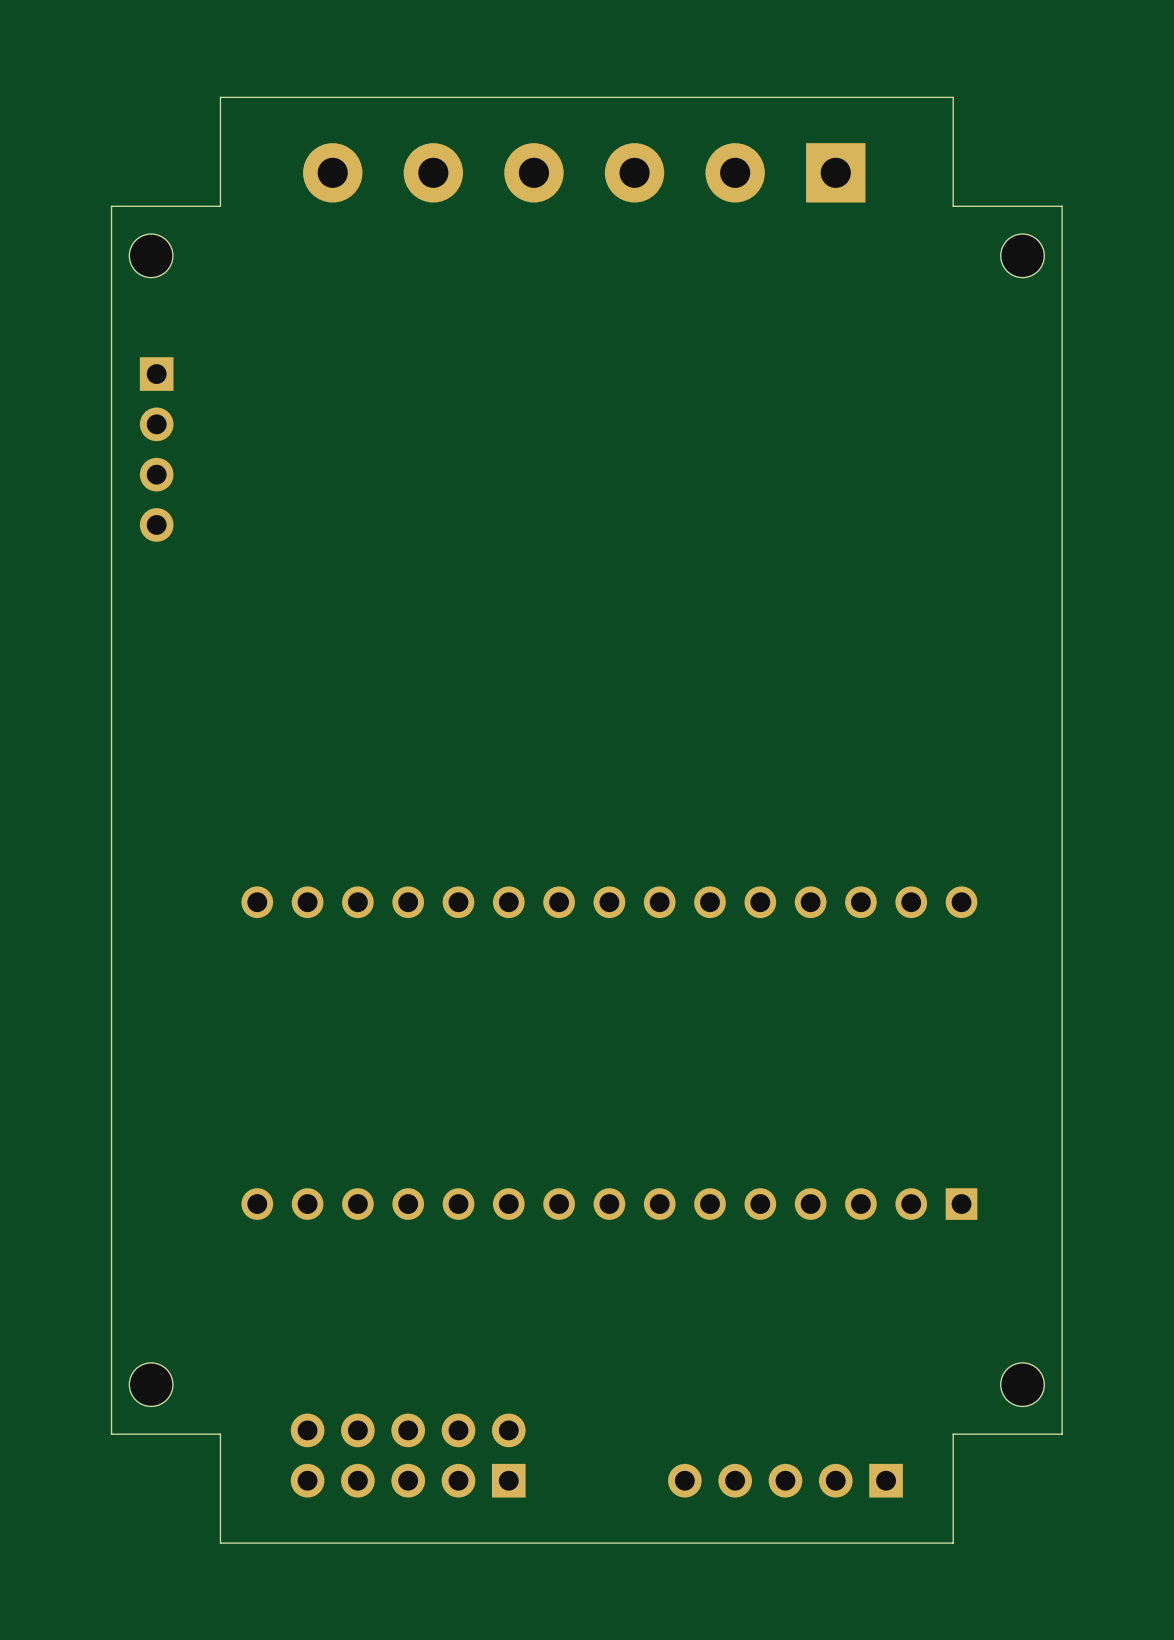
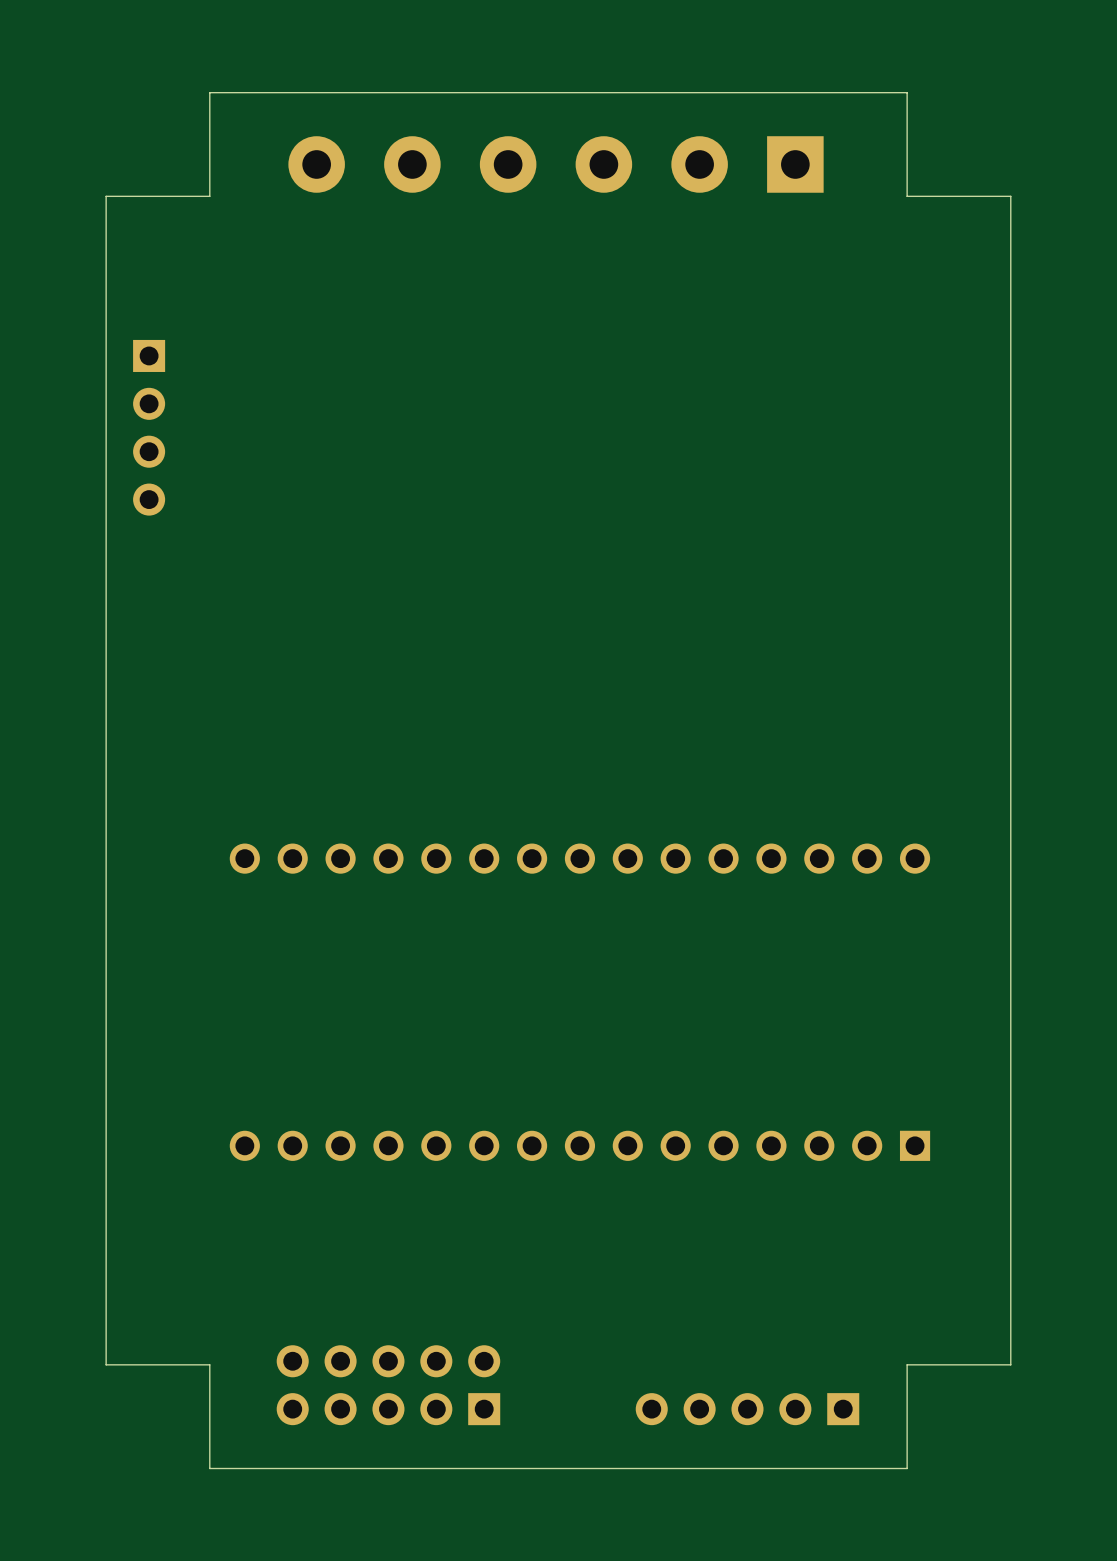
part: (151, 255) -> none
part: (1022, 255) -> none
part: (151, 1384) -> none
part: (1022, 1384) -> none

